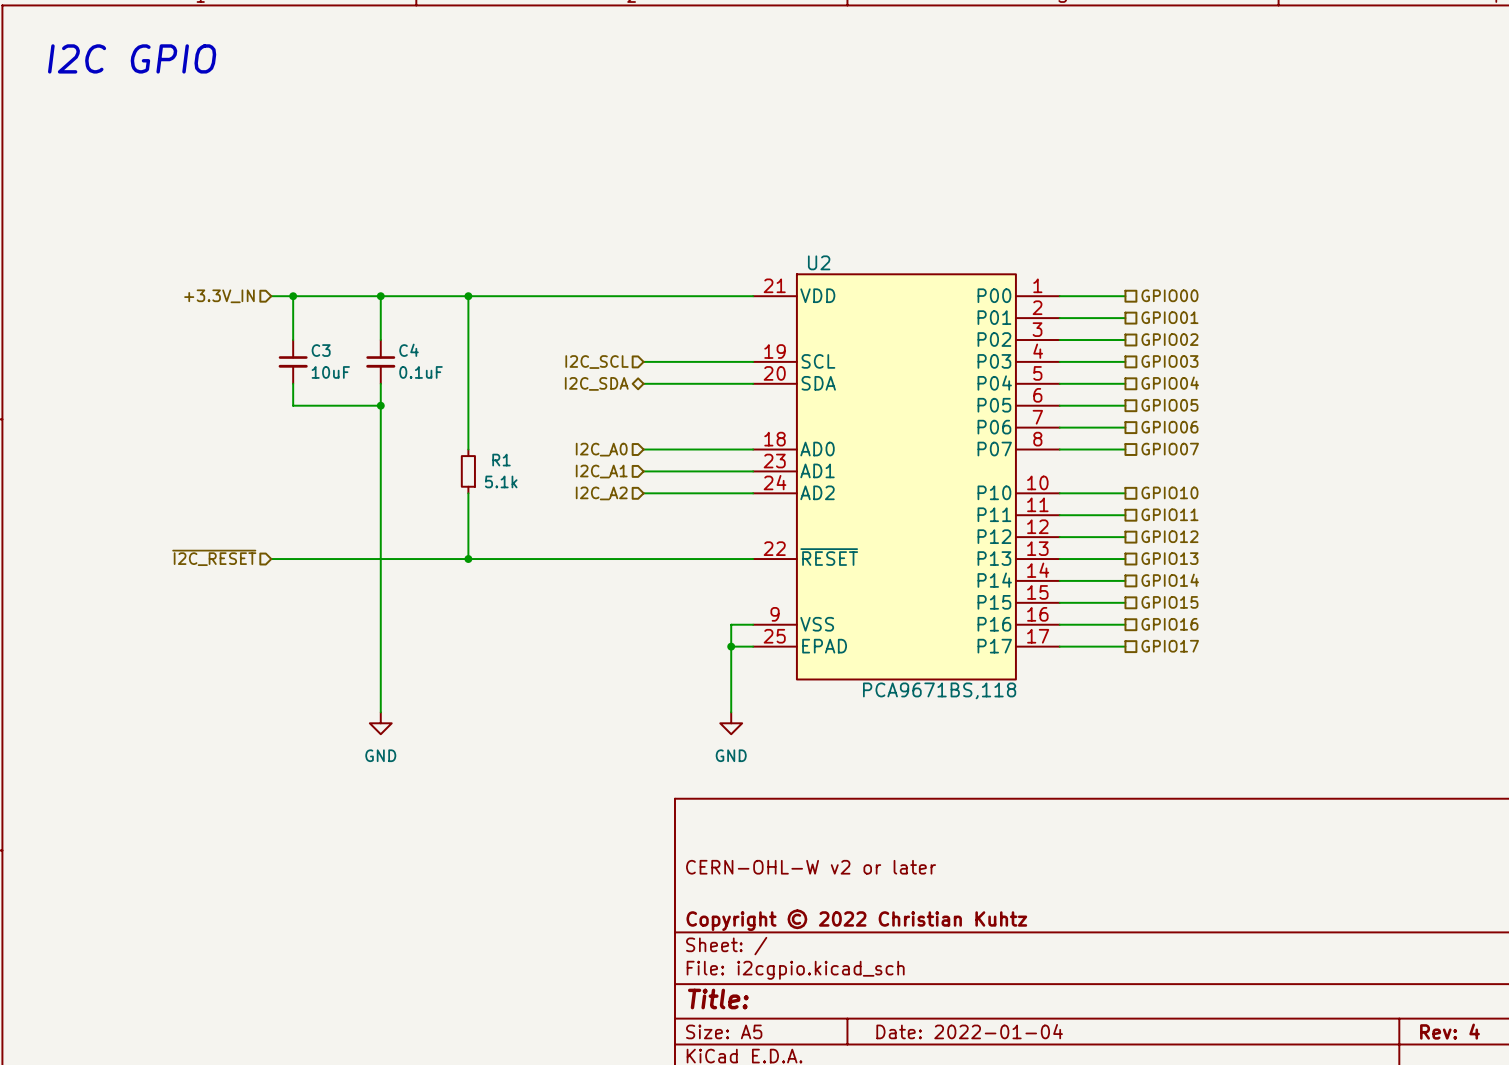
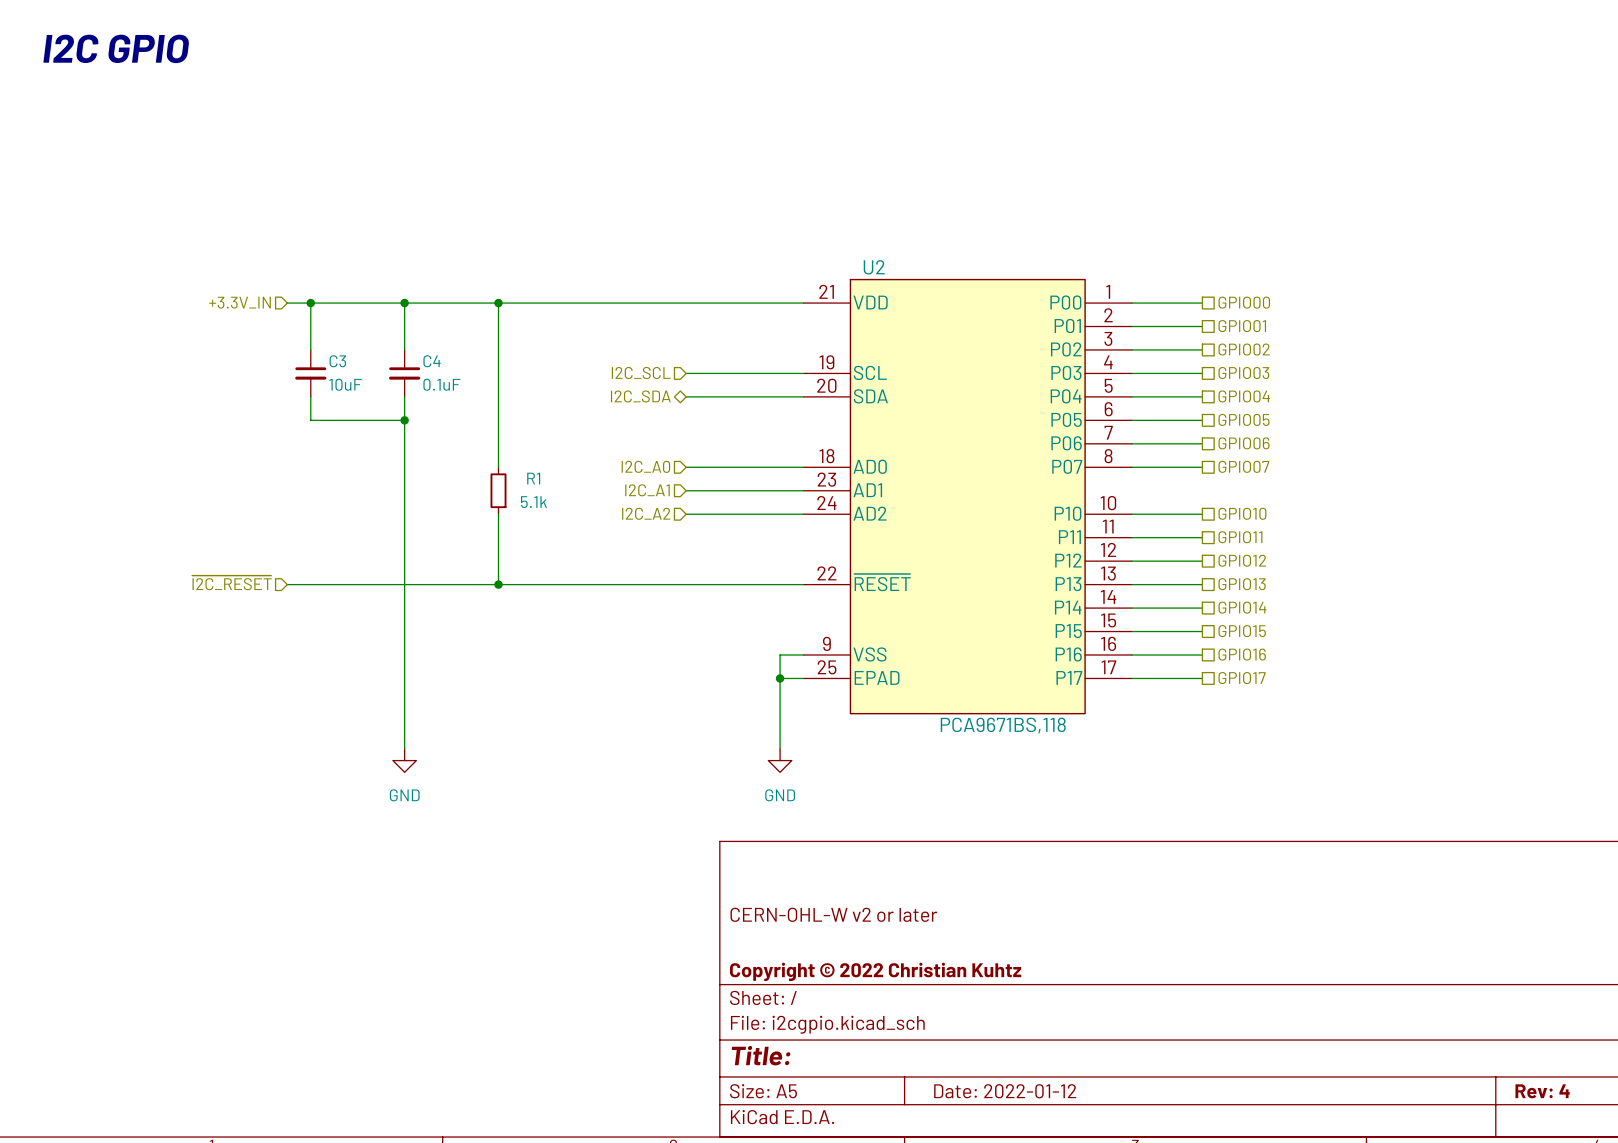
title block: Date: 2022-01-04 (969, 1031) -> Date: 2022-01-12 (1005, 1091)

